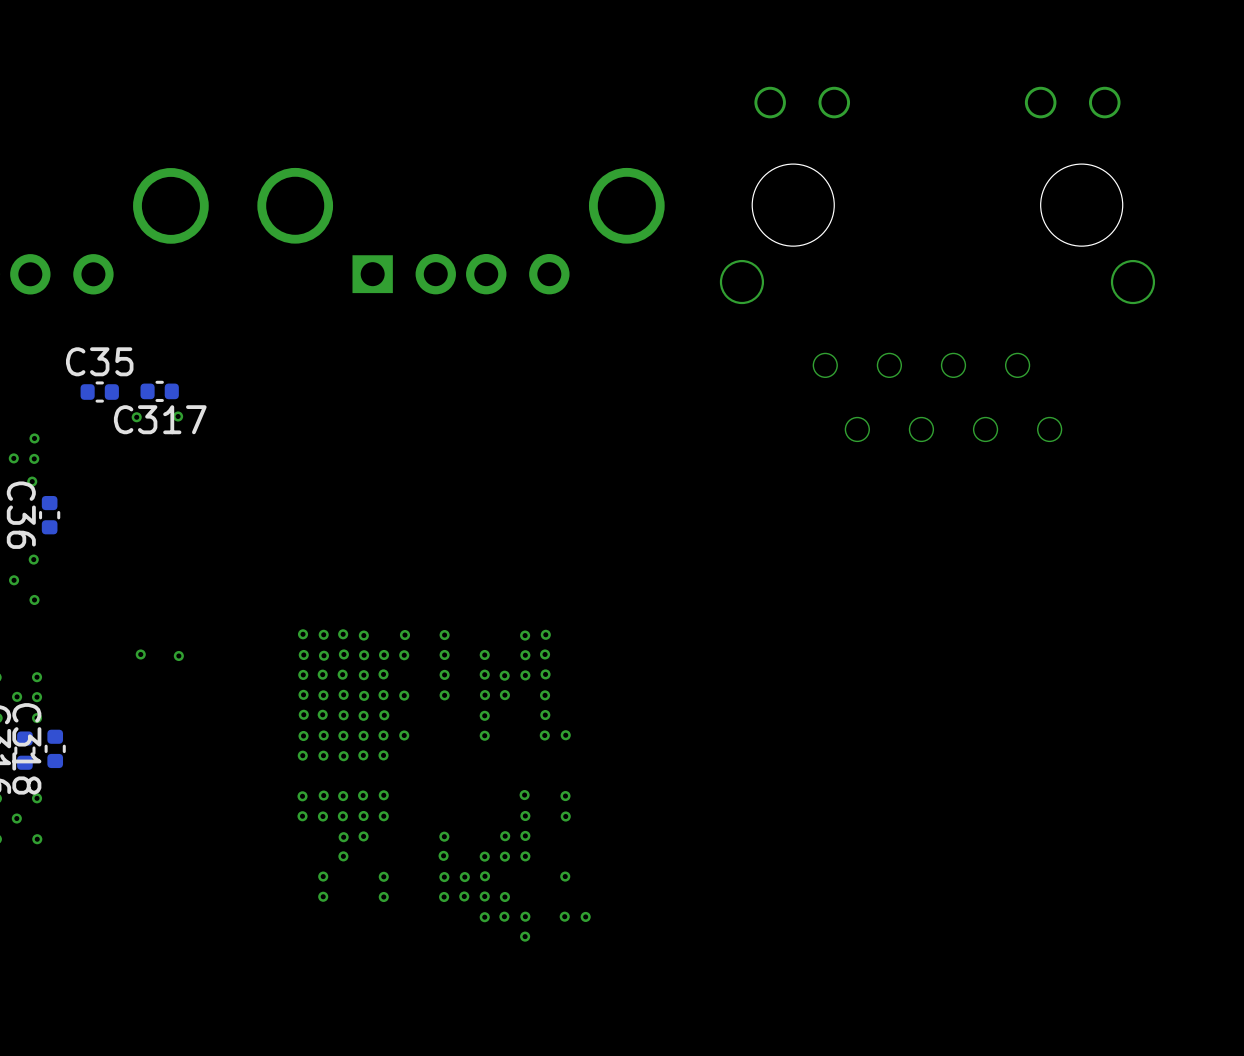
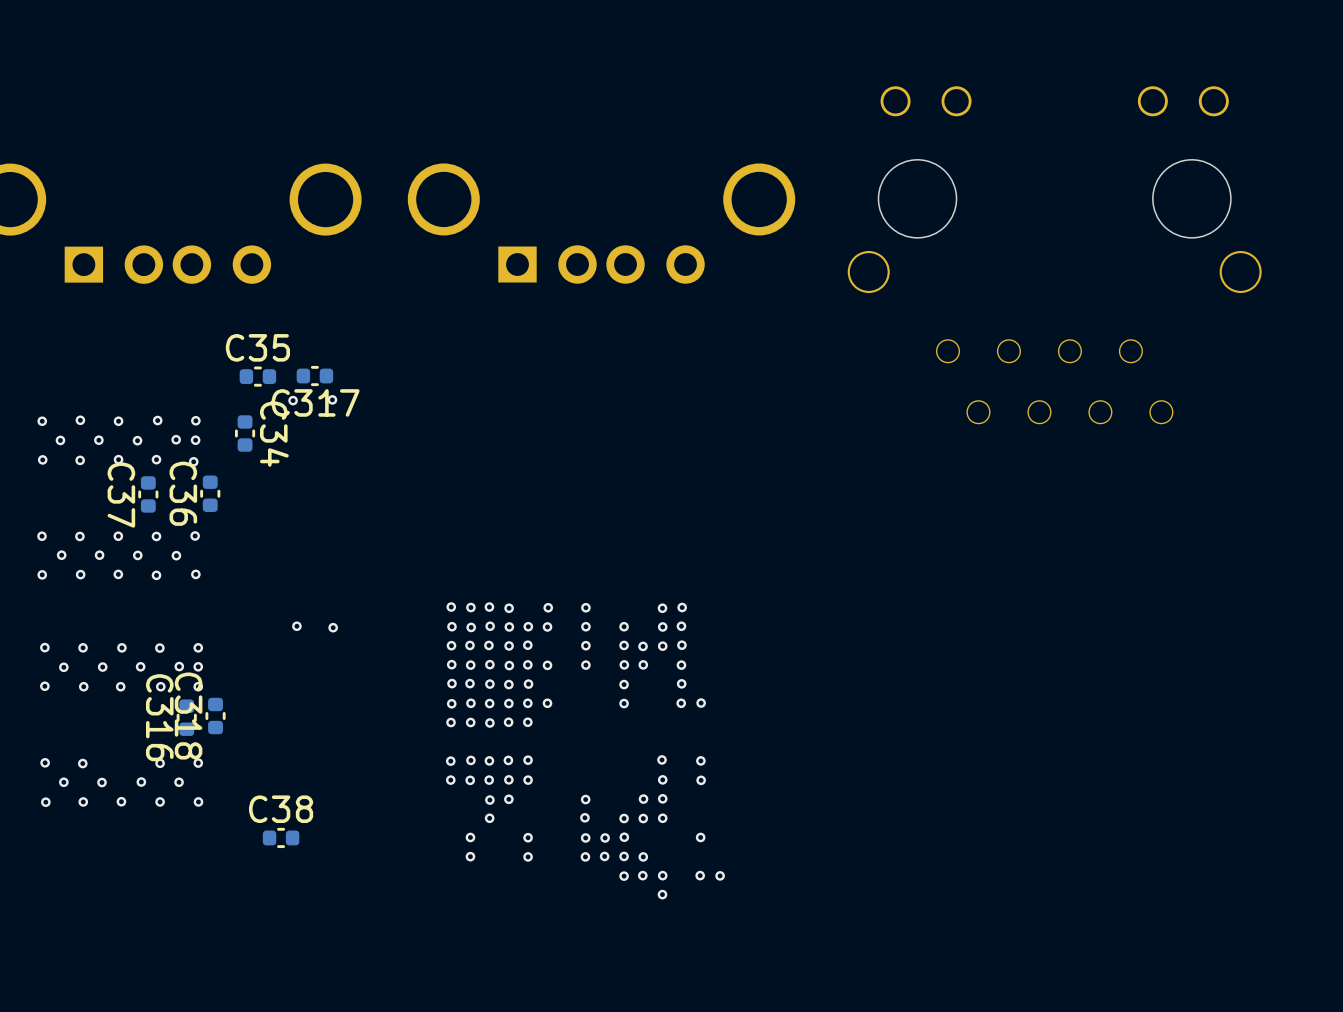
C34: none -> (245, 433)
C38: none -> (281, 837)

